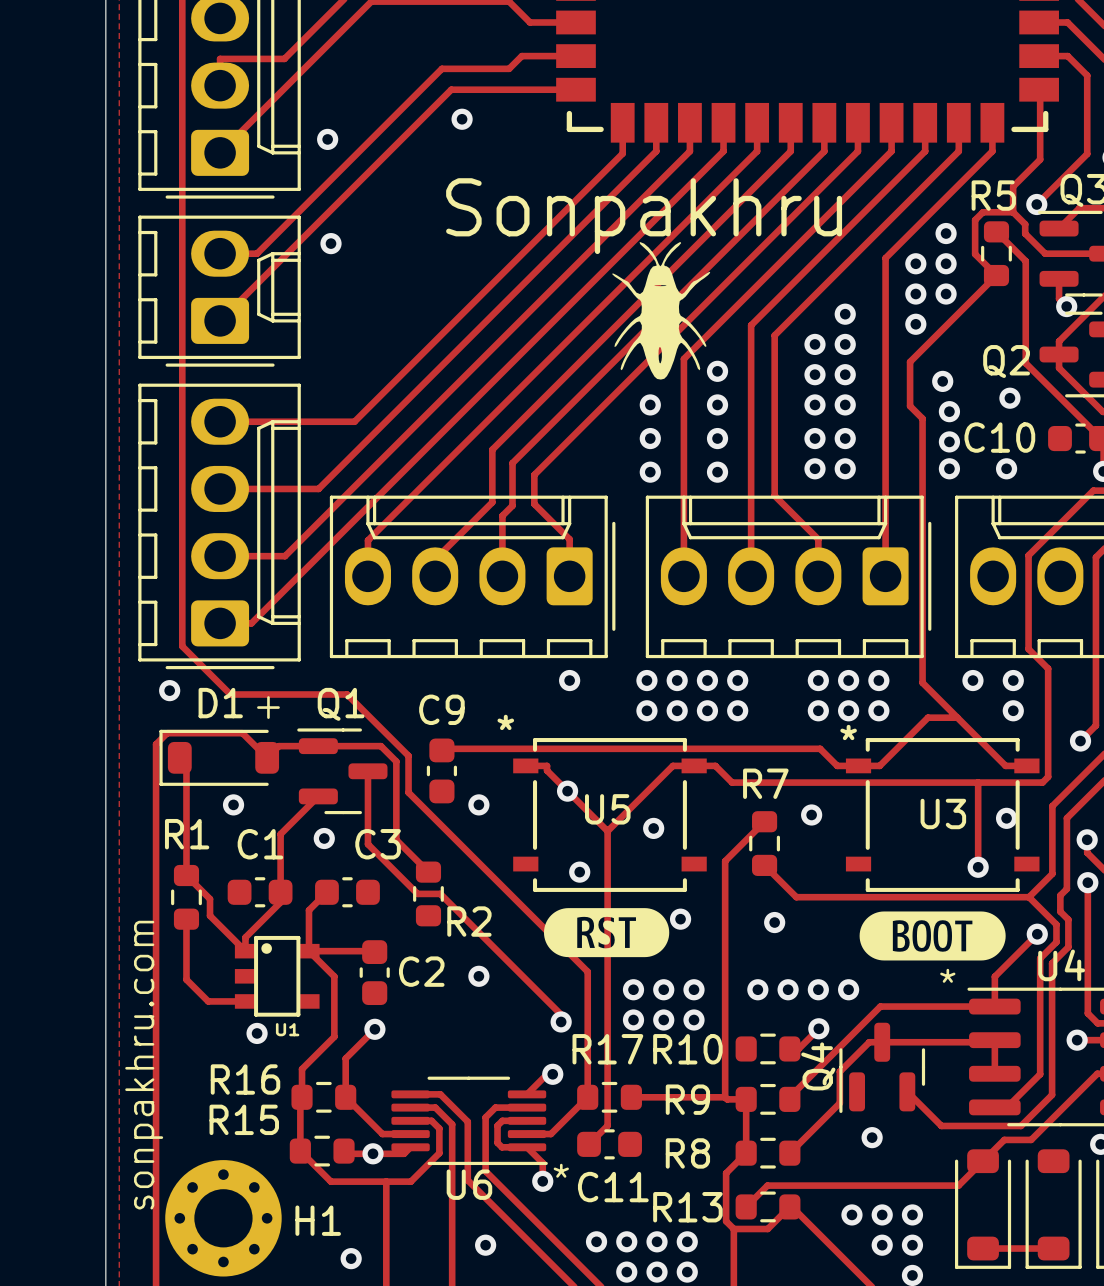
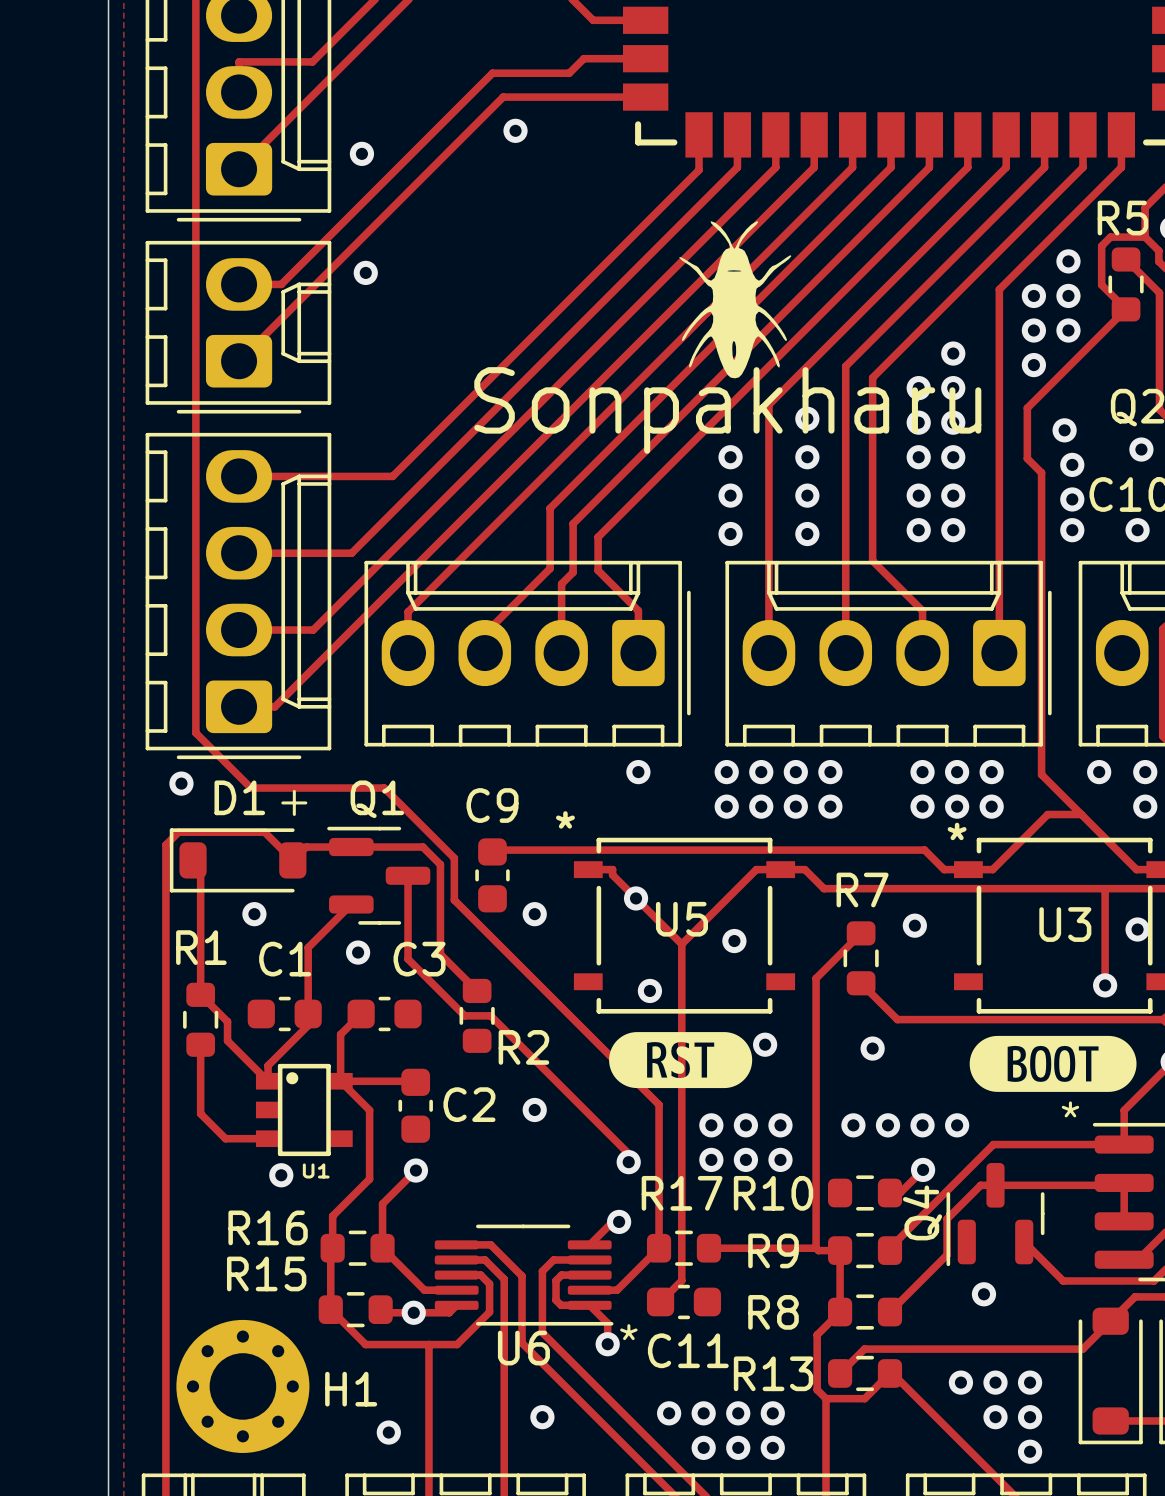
text: Sonpakhru (644, 216) -> none
drawing position: (661, 310) -> (735, 299)
text: none -> Sonpakharu (727, 410)
text: sonpakhru.com (144, 1065) -> none

